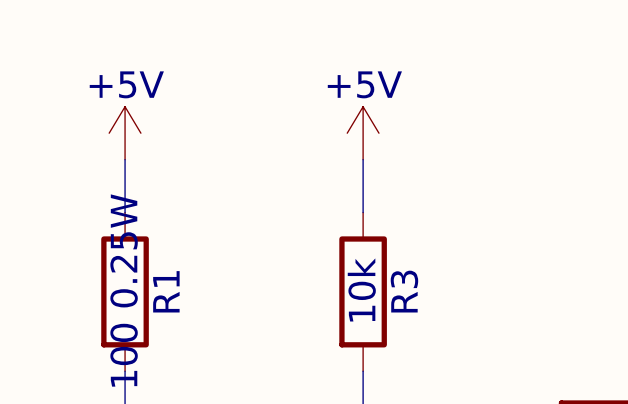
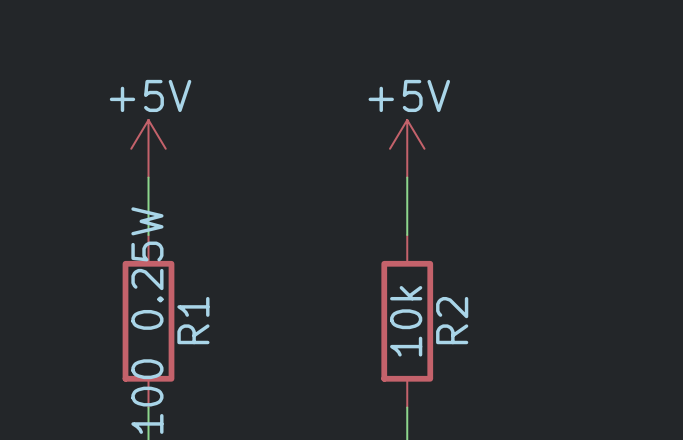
R3 name: R3 (404, 291) -> R2 (452, 320)

